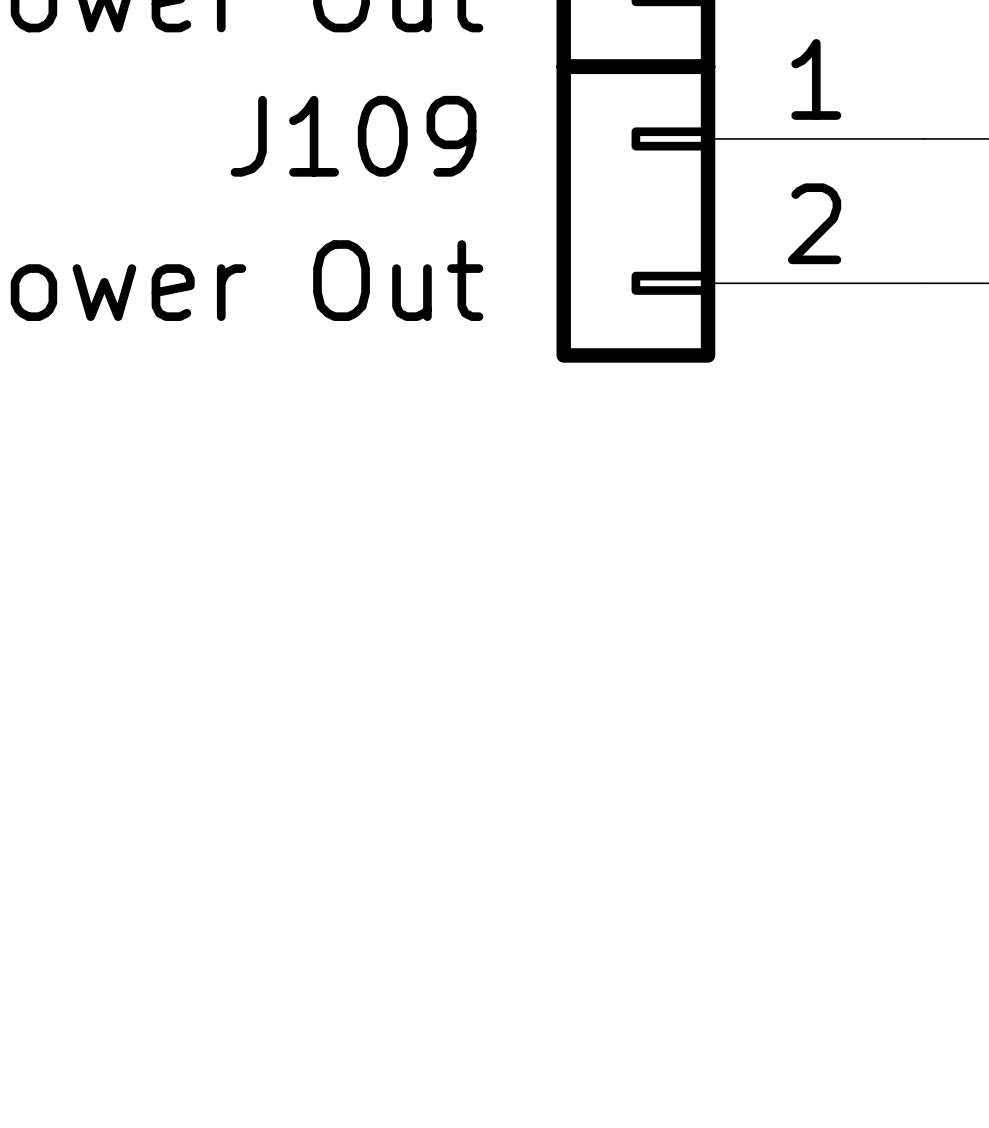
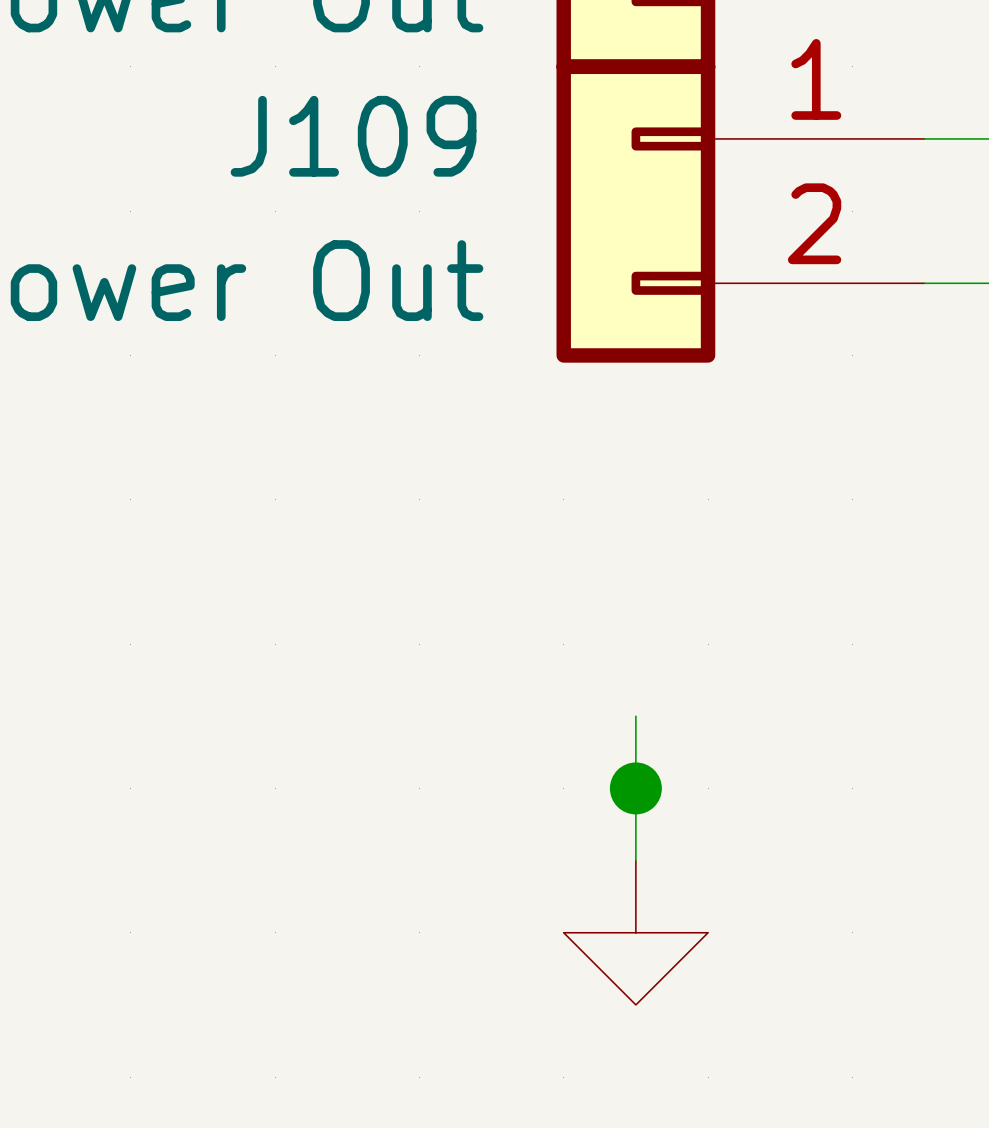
wire: none -> (635, 716) (635, 860)
junction: none -> (635, 788)
power symbol: none -> (635, 932)

